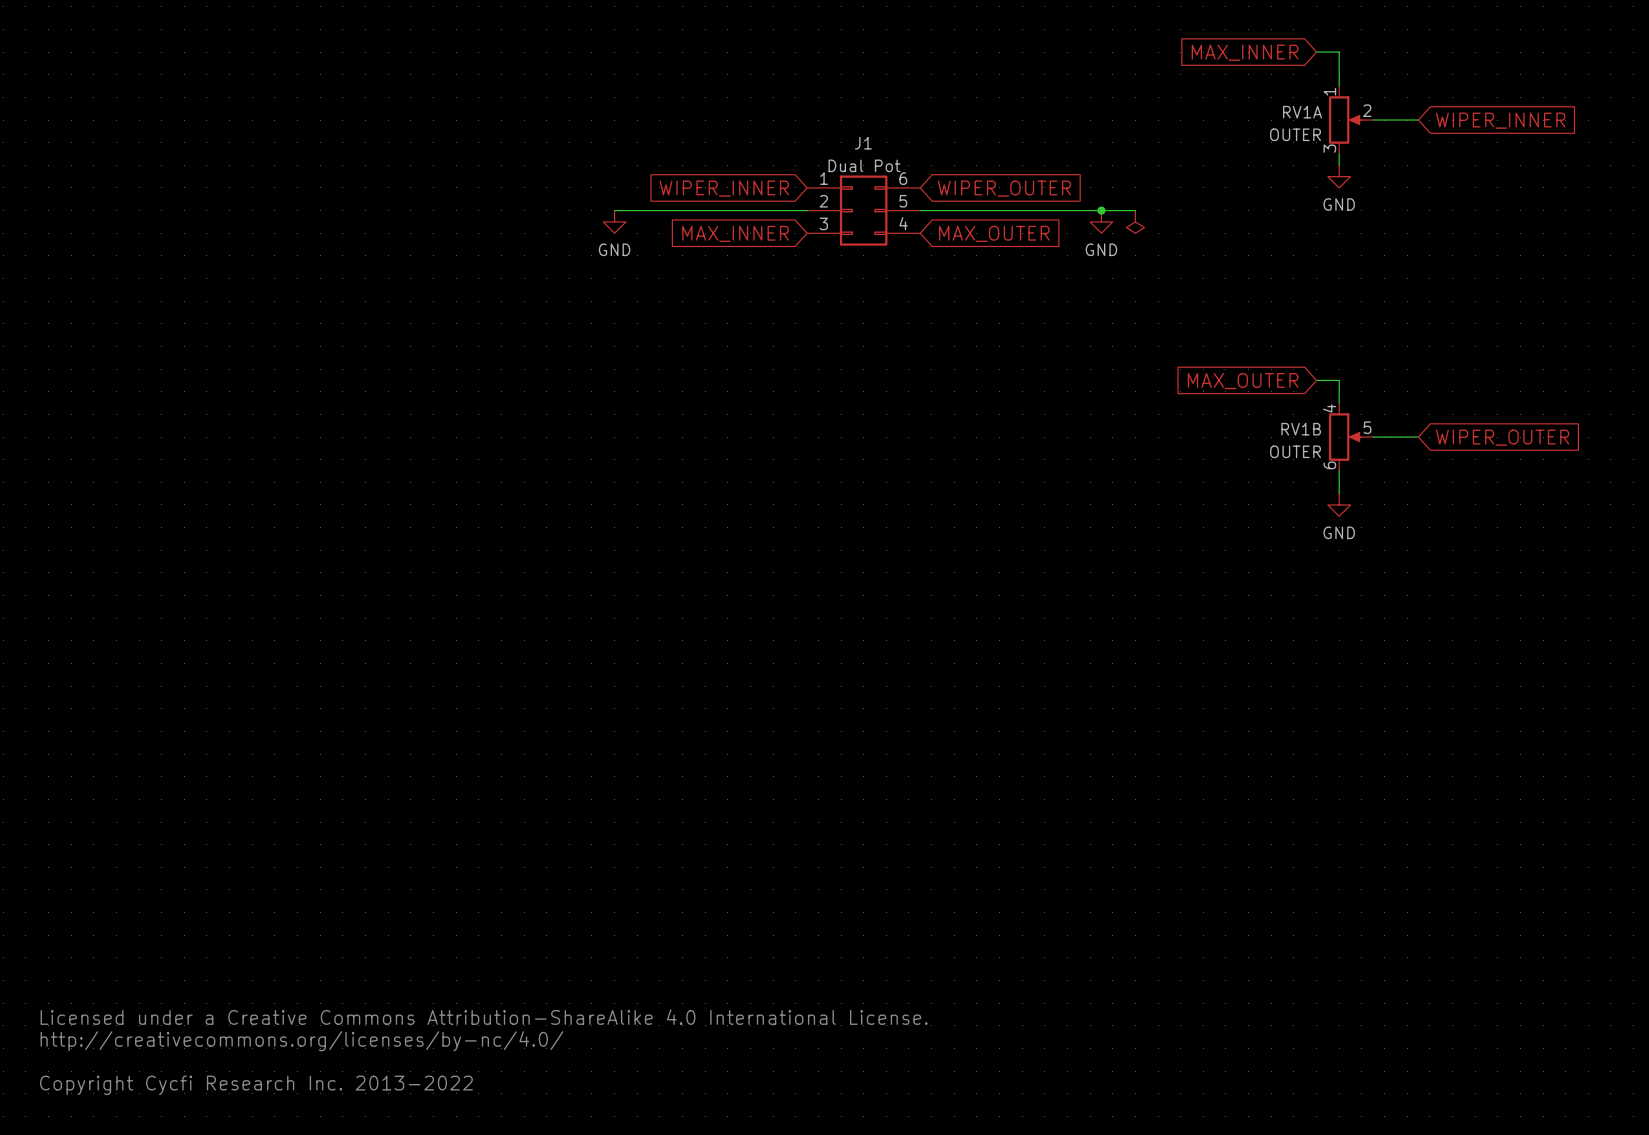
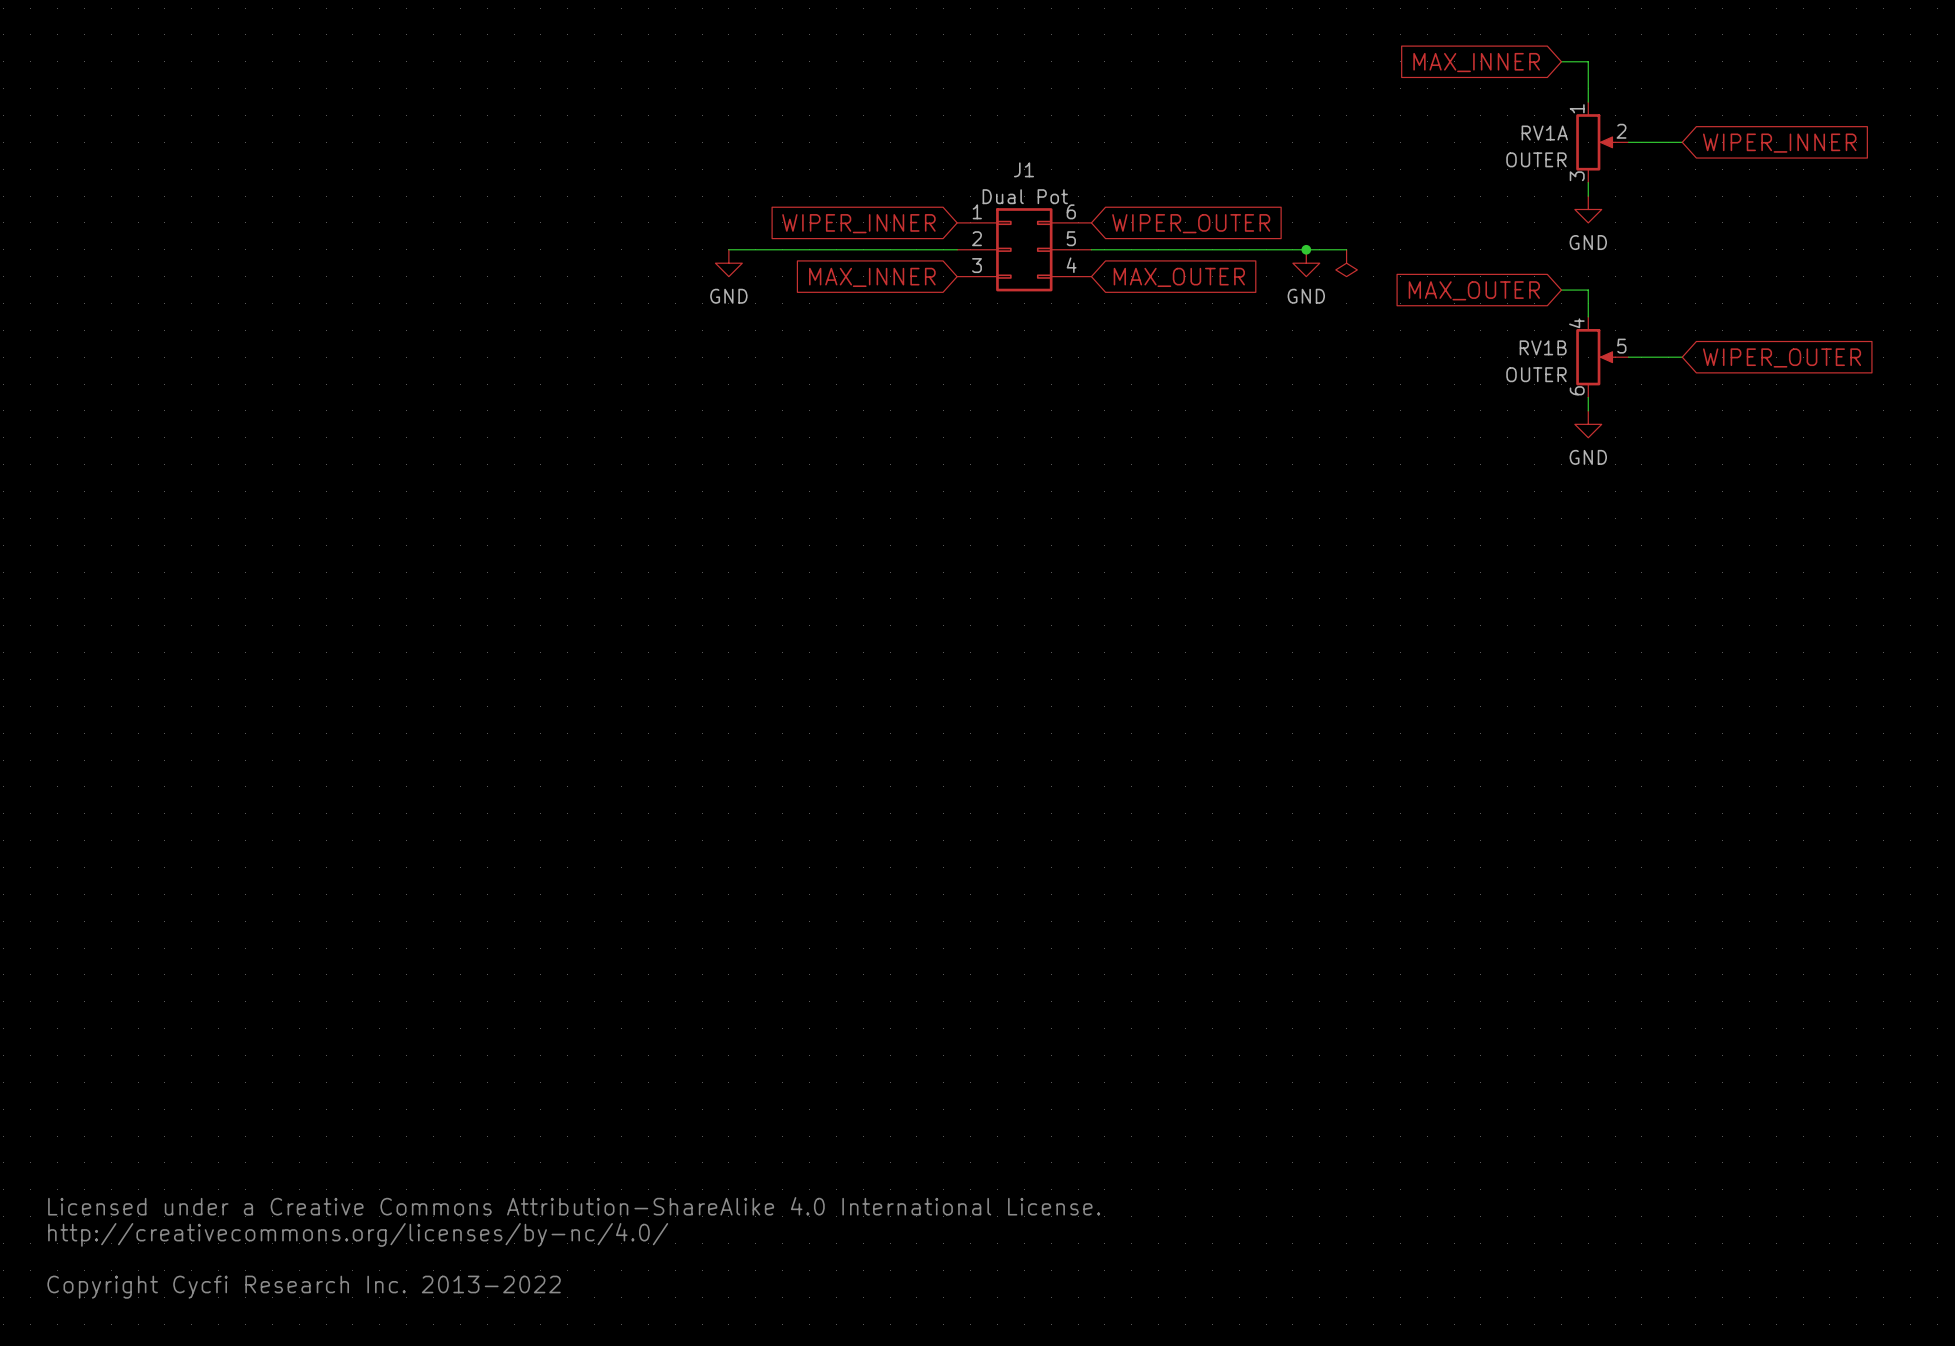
wire: none -> (1588, 397) (1588, 410)
wire: (1316, 380) (1339, 380) (1339, 403) -> (1561, 290) (1588, 290) (1588, 316)
global label position: MAX_OUTER (1243, 381) -> MAX_OUTER (1474, 290)
RV1B position: (1351, 437) -> (1602, 357)
wire: (1373, 437) (1418, 437) -> (1628, 357) (1682, 357)
global label position: WIPER_OUTER (1502, 437) -> WIPER_OUTER (1782, 357)
wire: (1339, 471) (1339, 493) -> none
power symbol position: GND (1339, 504) -> GND (1588, 424)

